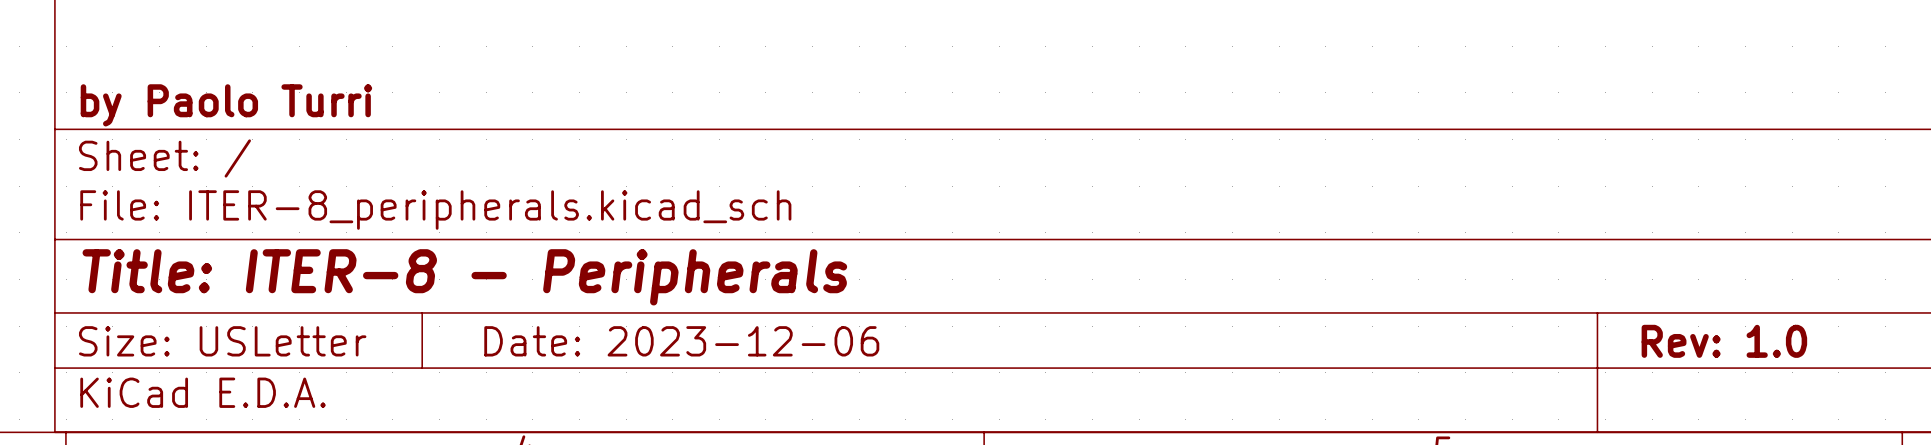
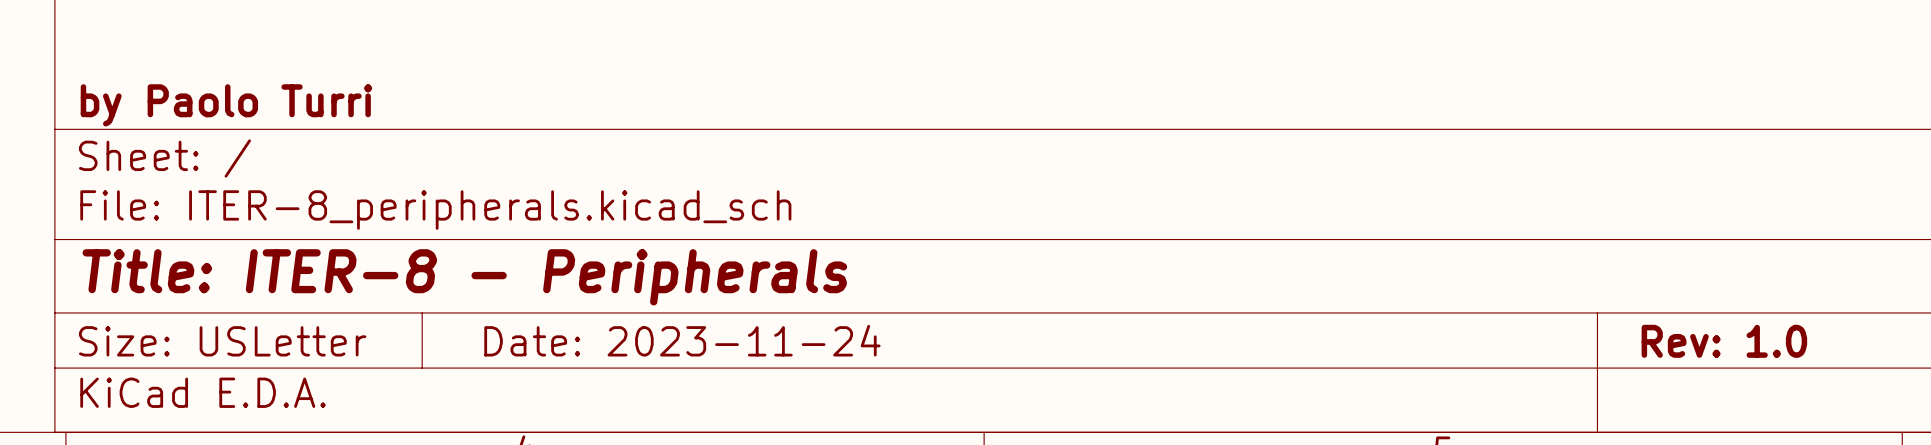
title block: Date: 2023-12-06 (681, 341) -> Date: 2023-11-24 (682, 340)

